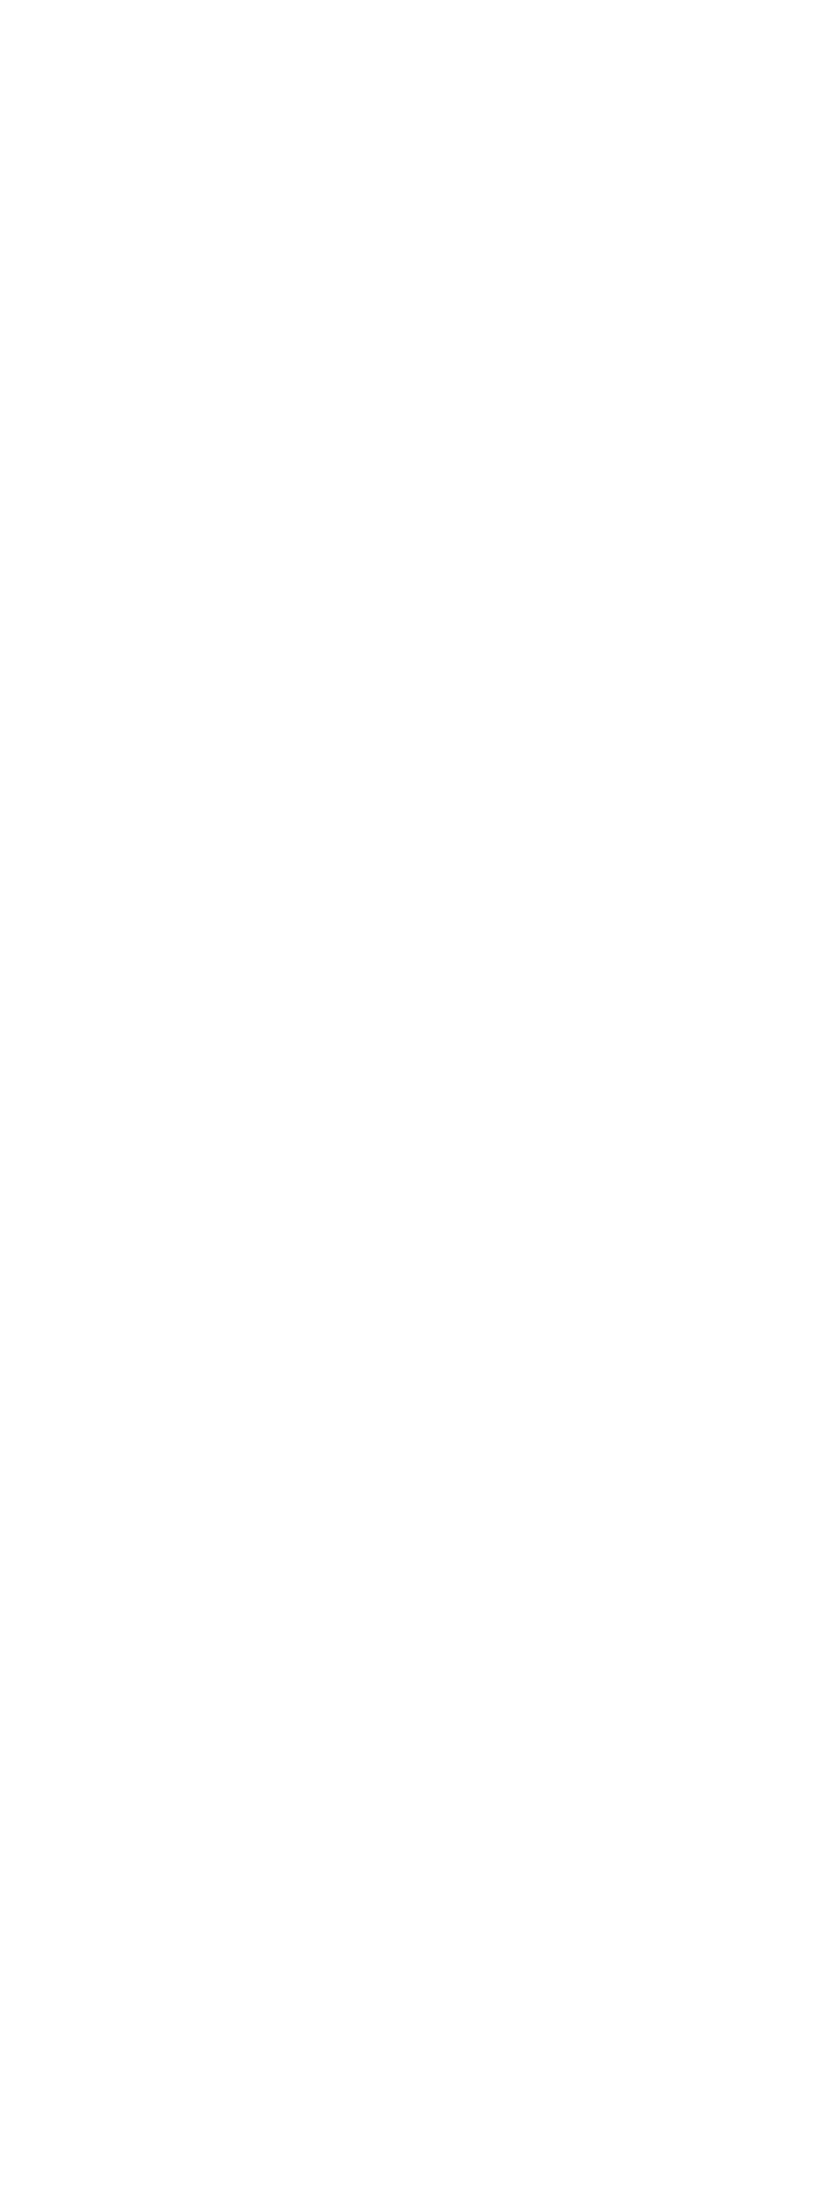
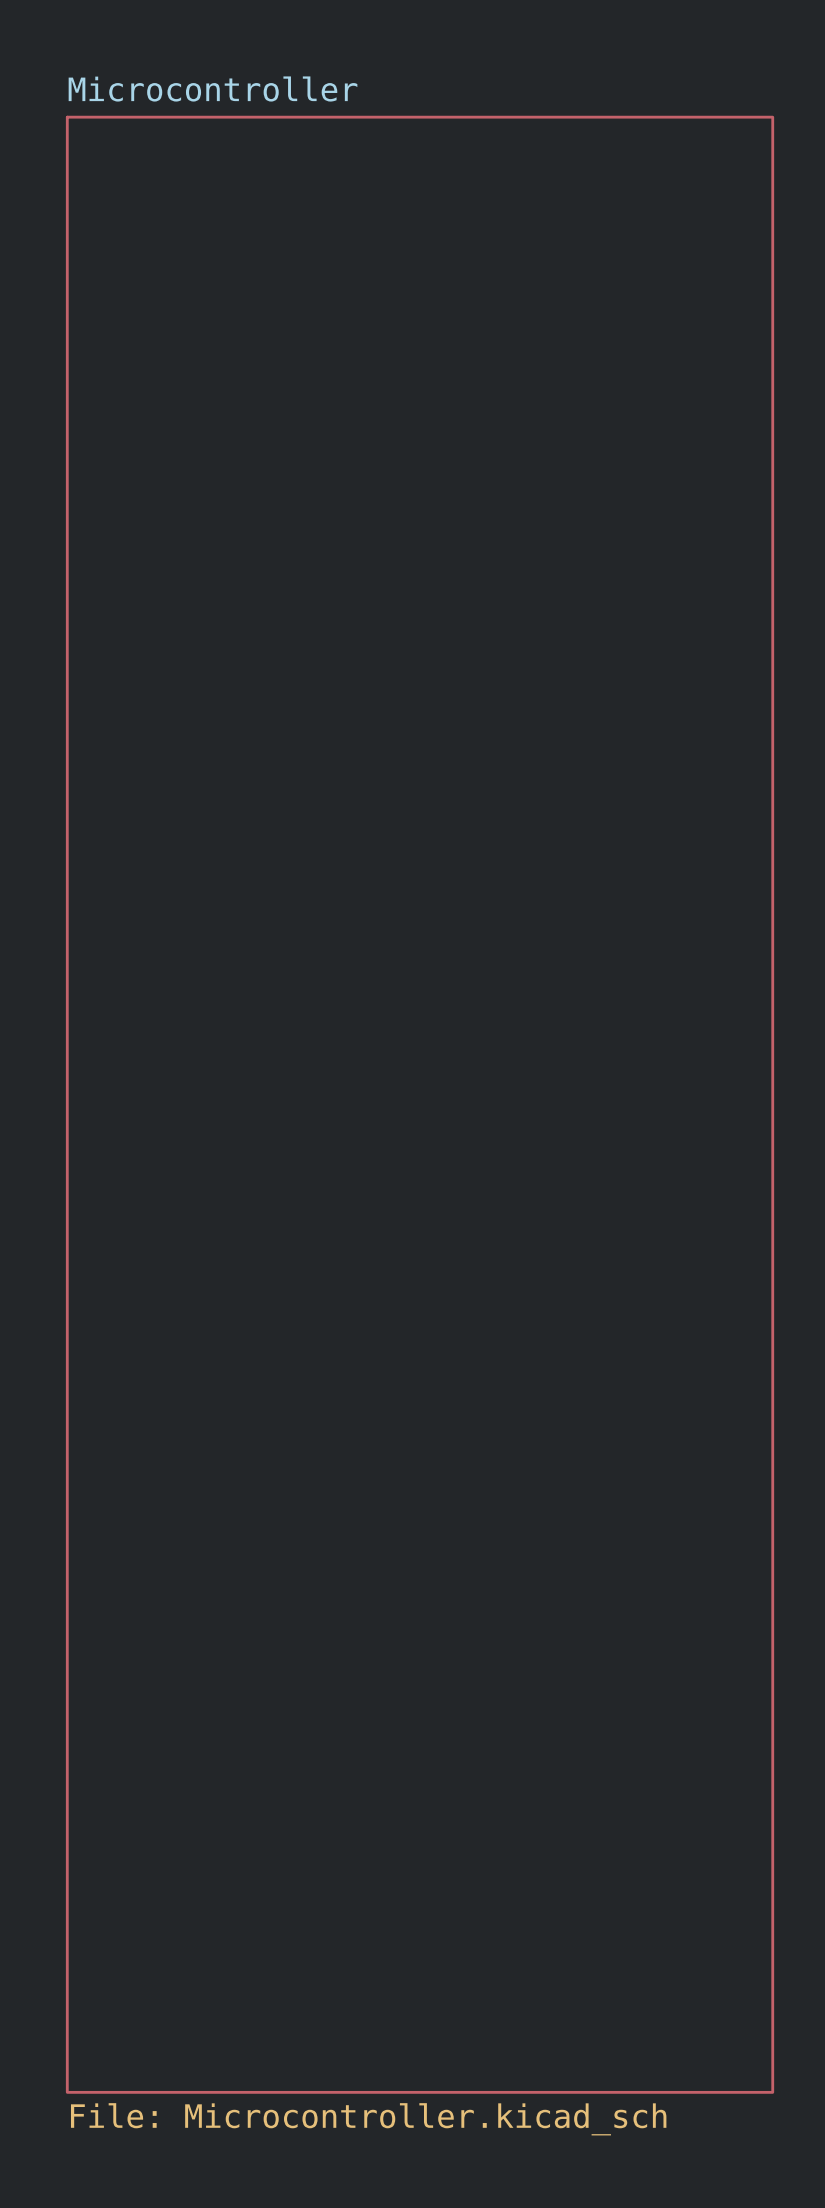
sheet Microcontroller: none -> File: Microcontroller.kicad_sch (420, 1104)

